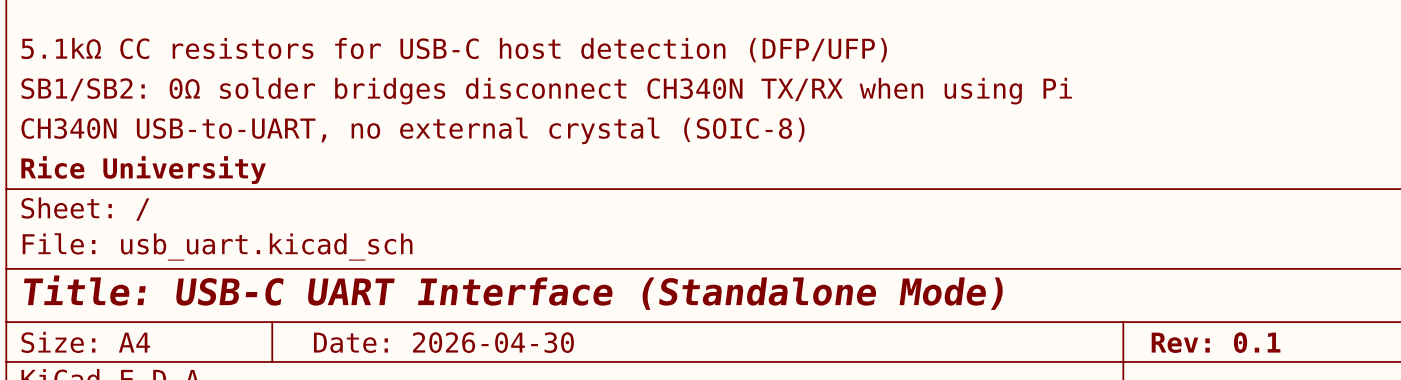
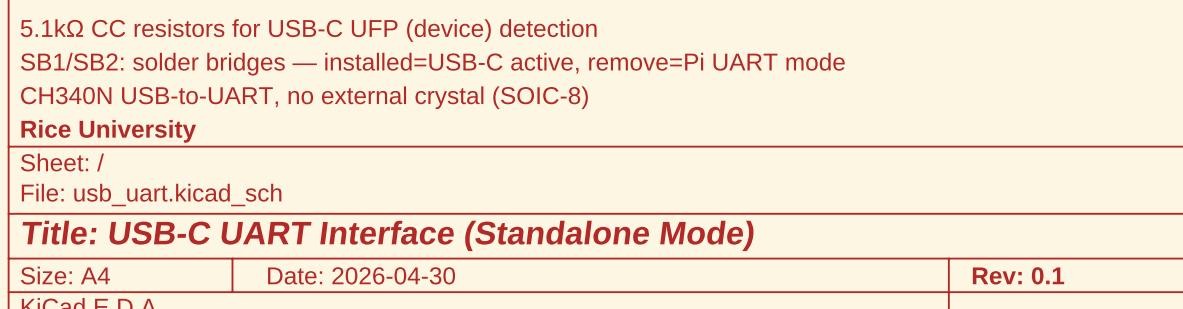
title block: 5.1kΩ CC resistors for USB-C host detection (DFP/UFP) (454, 50) -> 5.1kΩ CC resistors for USB-C UFP (device) detection (308, 30)
title block: SB1/SB2: 0Ω solder bridges disconnect CH340N TX/RX when using Pi (546, 91) -> SB1/SB2: solder bridges — installed=USB-C active, remove=Pi UART mode (432, 64)

